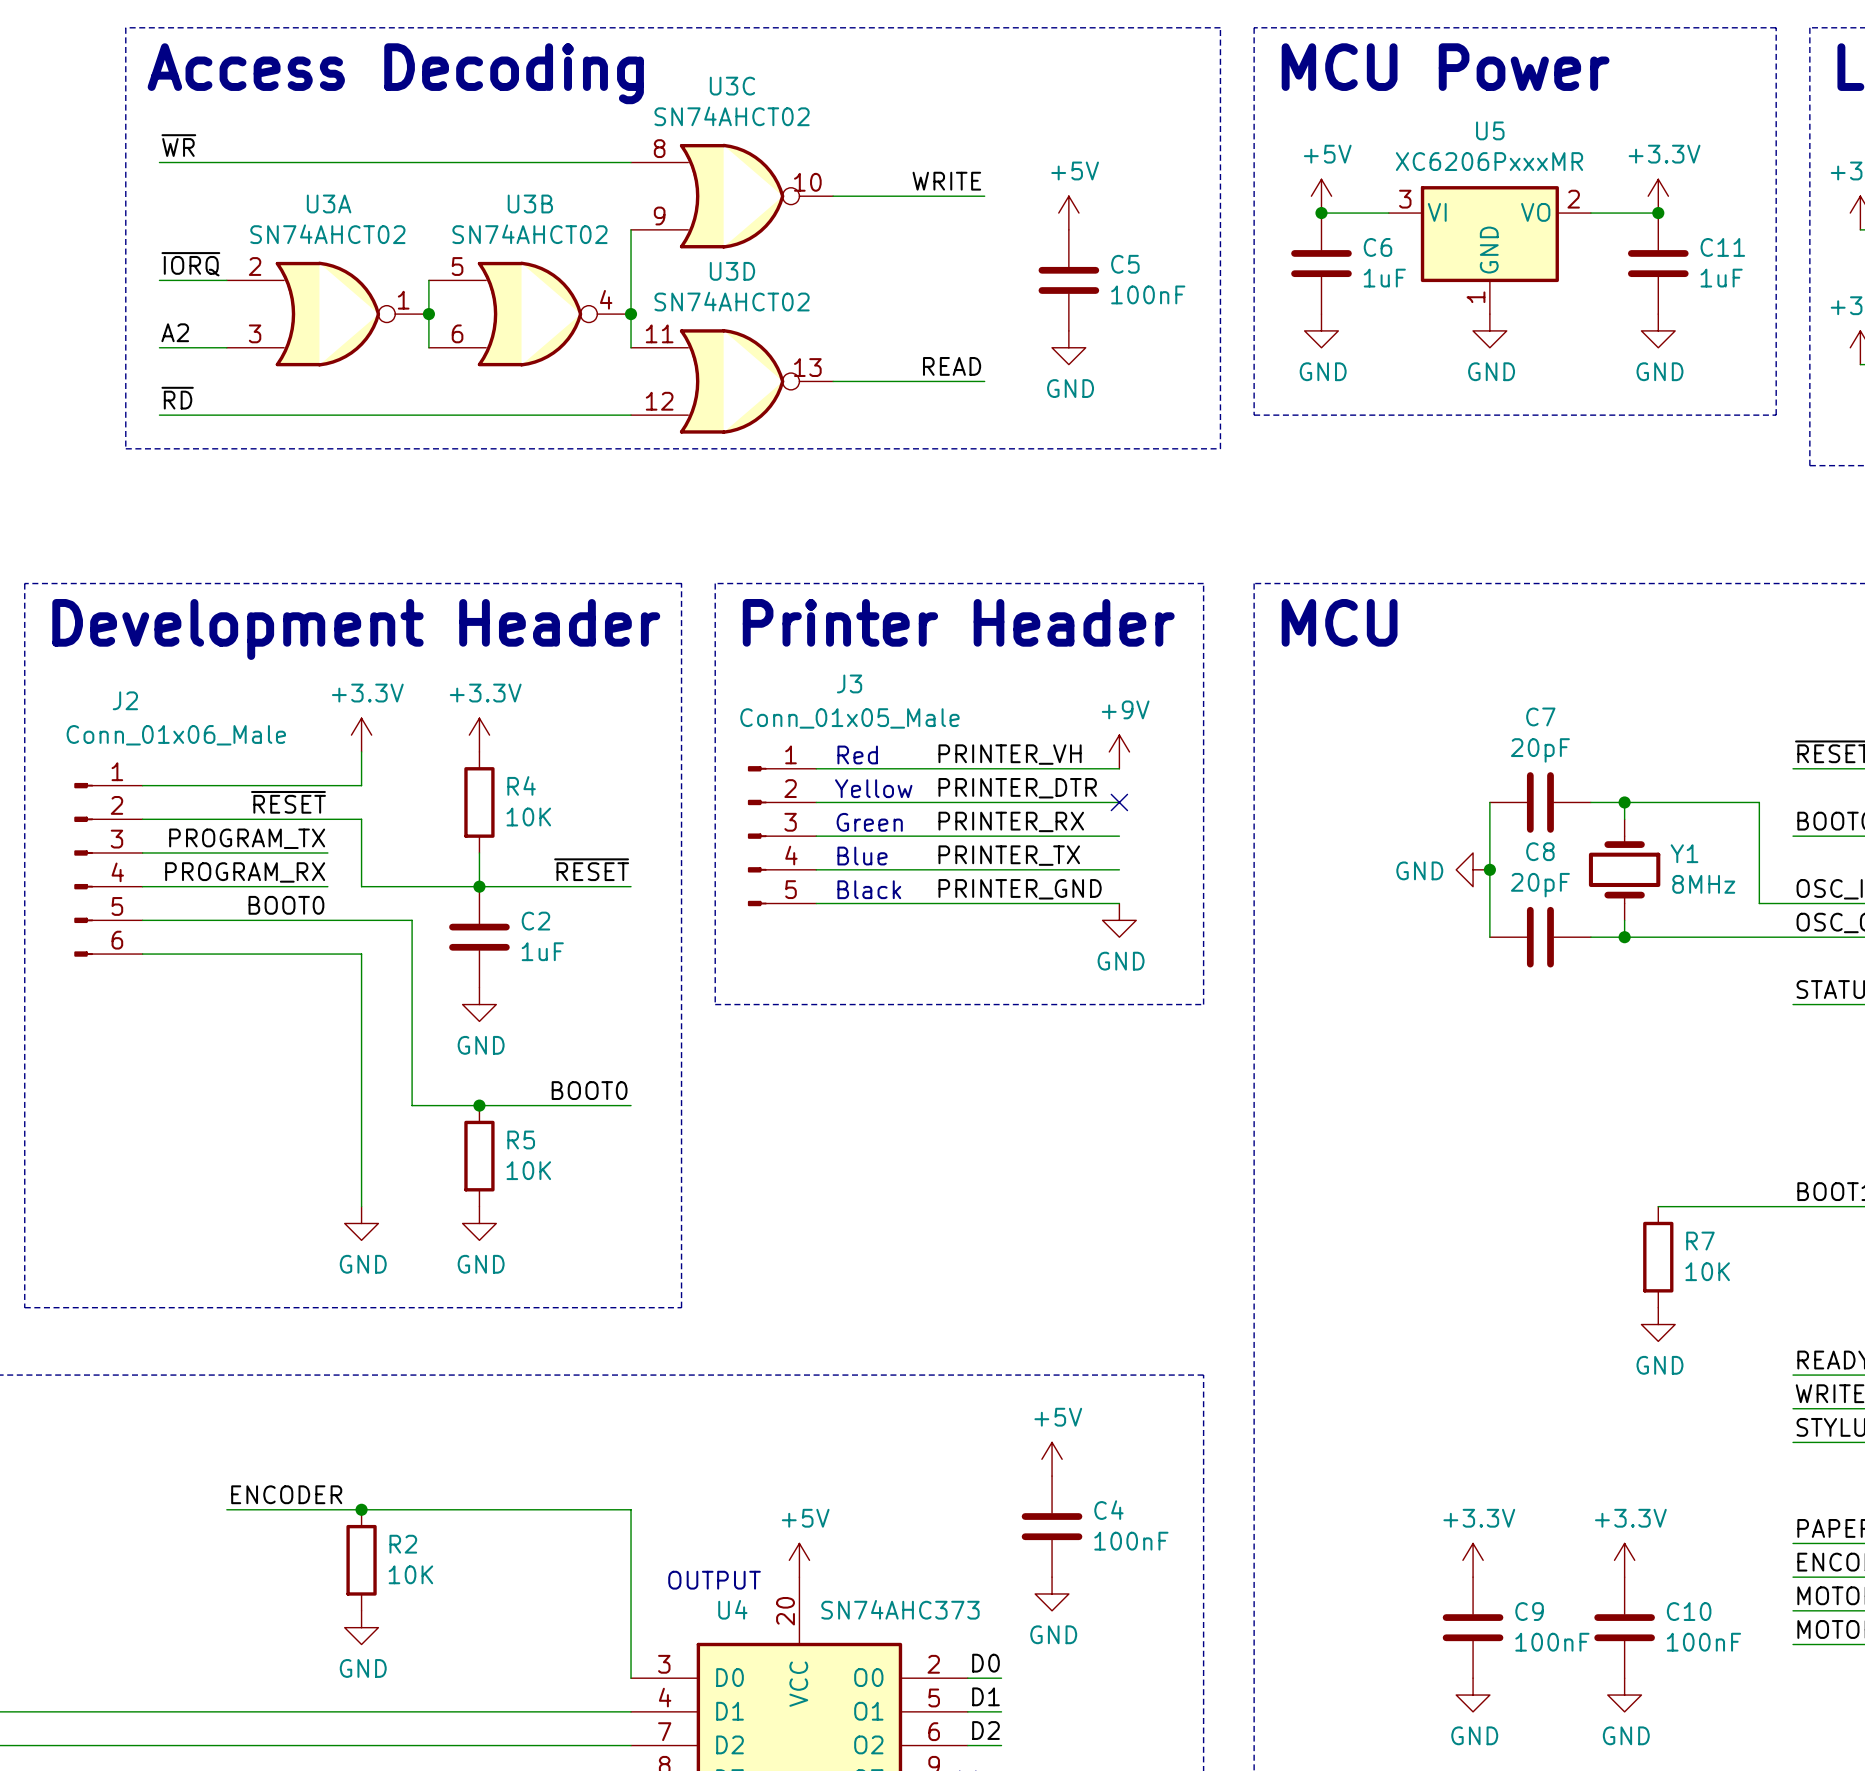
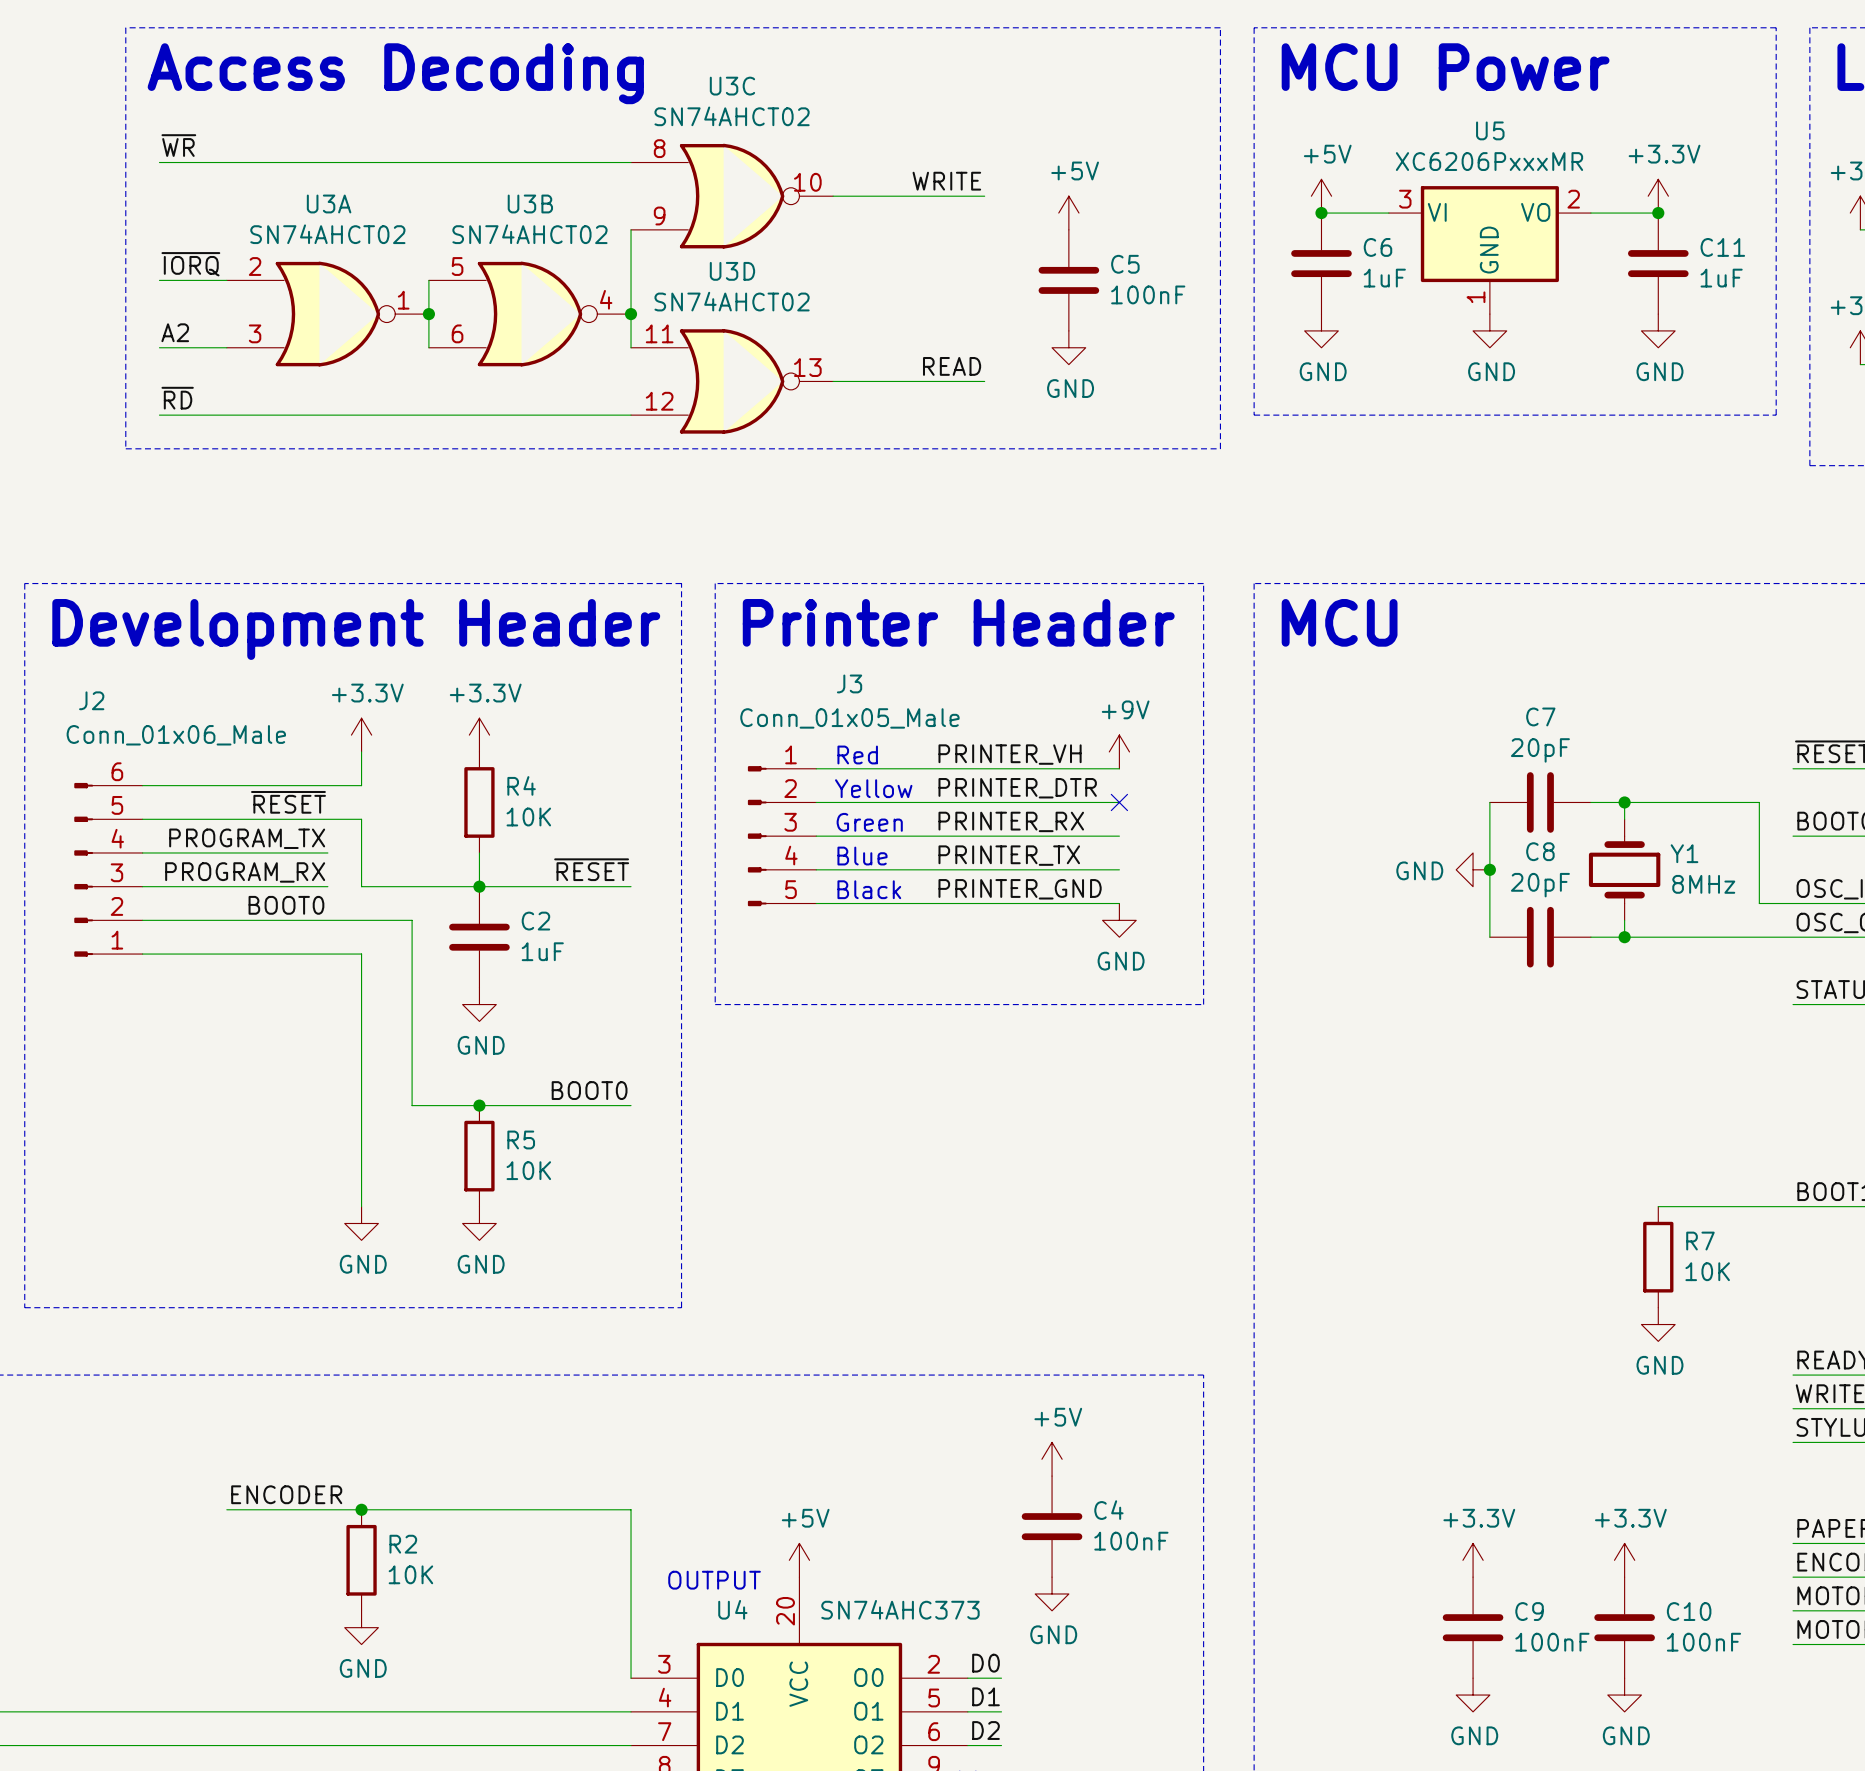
J2 name position: J2 (125, 700) -> J2 (91, 700)
J2 flip: as is (83, 869) -> up-down (83, 869)

